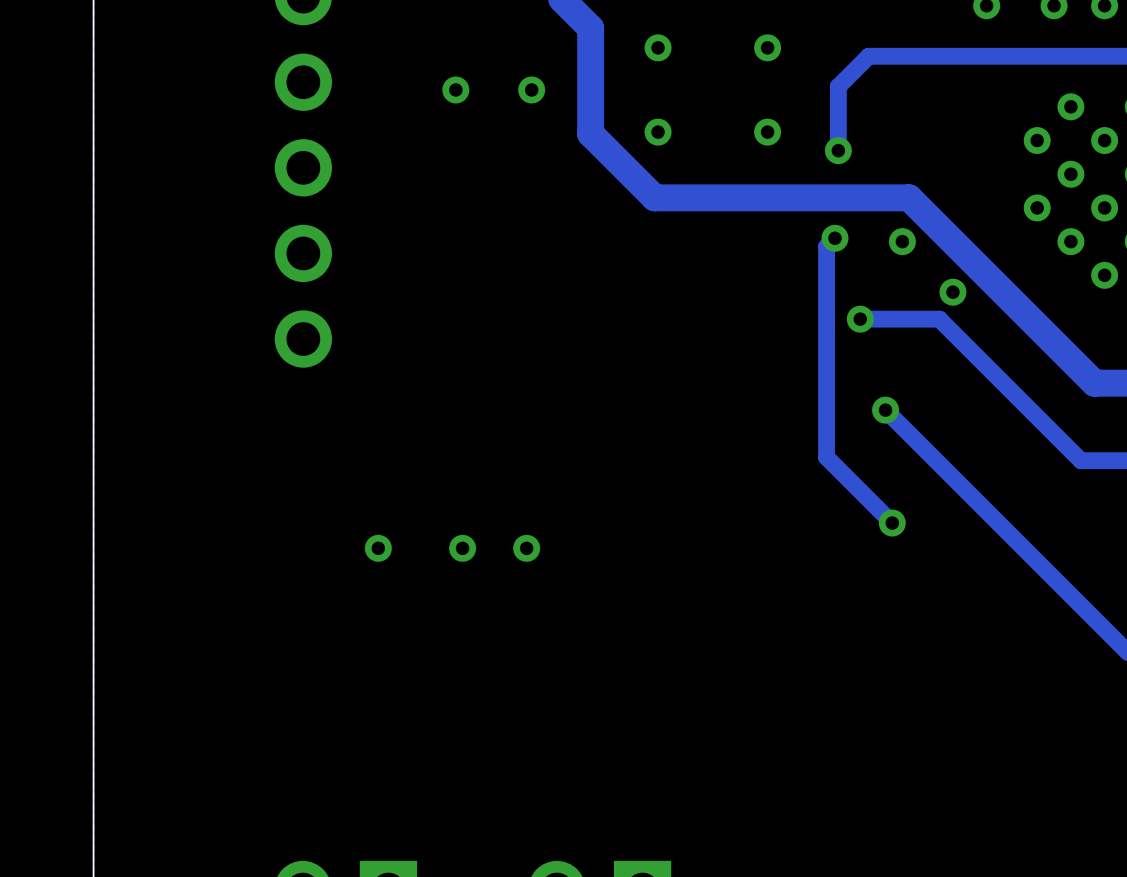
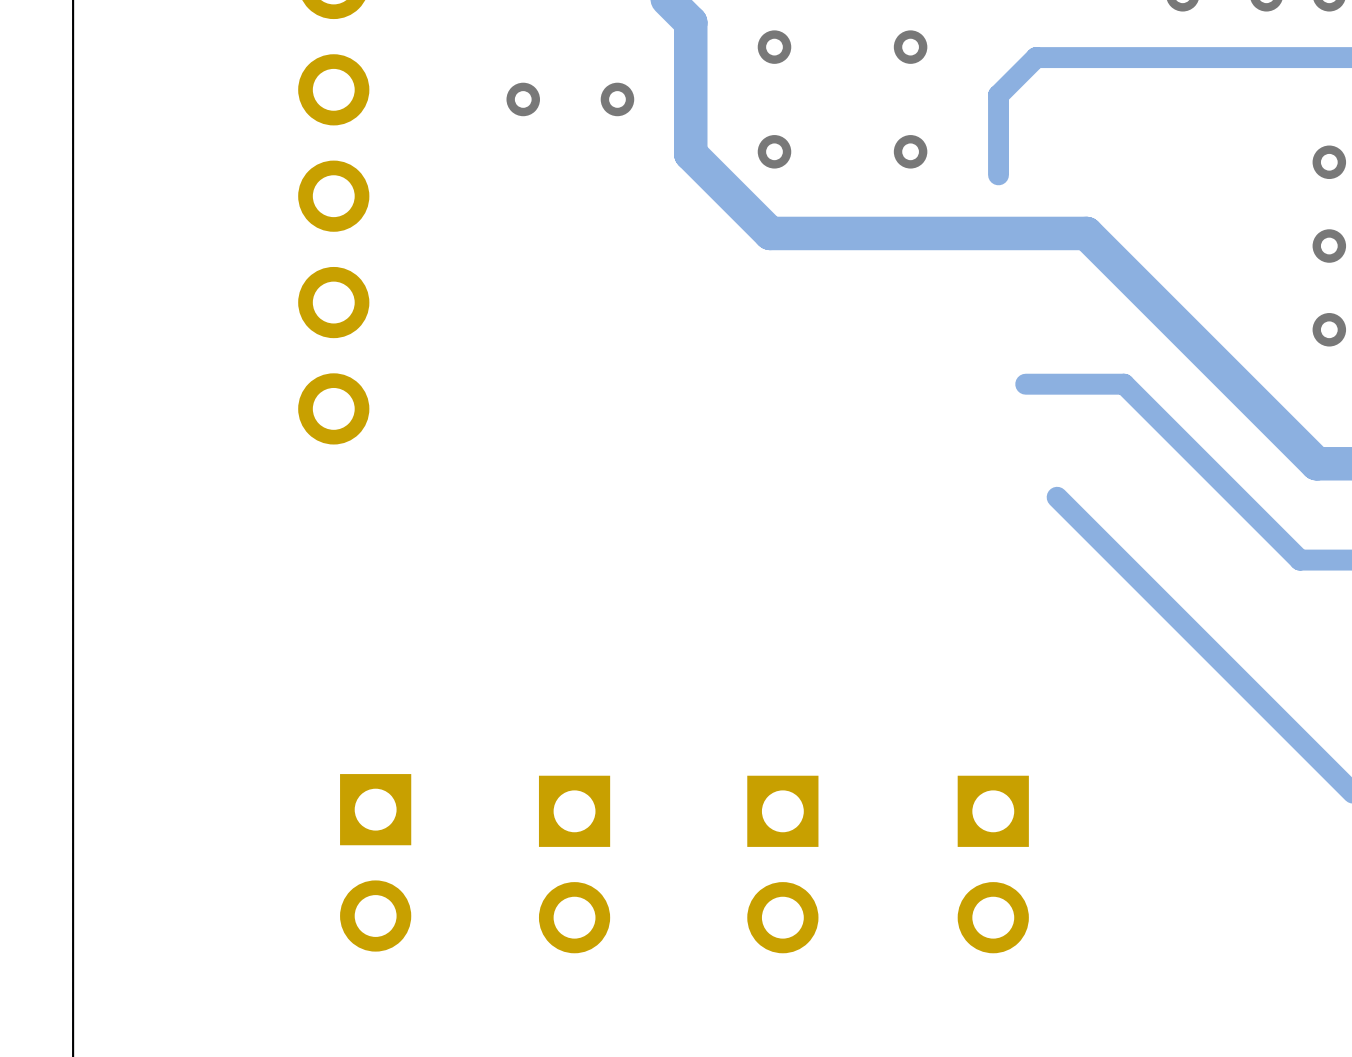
via: (1070, 106) -> none
via: (1037, 140) -> none
via: (838, 150) -> none
via: (1070, 174) -> none
via: (1037, 207) -> none
track: (835, 238) (826, 246) (826, 457) (892, 523) -> none
via: (835, 238) -> none
via: (902, 241) -> none
via: (1070, 241) -> none
via: (952, 292) -> none
via: (860, 319) -> none
via: (885, 410) -> none
via: (892, 523) -> none
via: (378, 548) -> none
via: (462, 548) -> none
via: (526, 548) -> none
part: none -> (375, 862)
part: none -> (574, 864)
part: none -> (782, 864)
part: none -> (993, 864)

